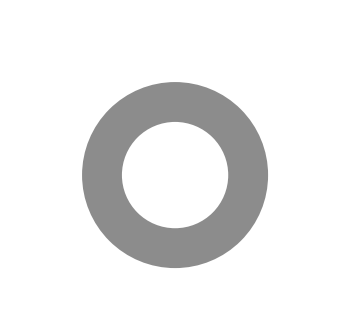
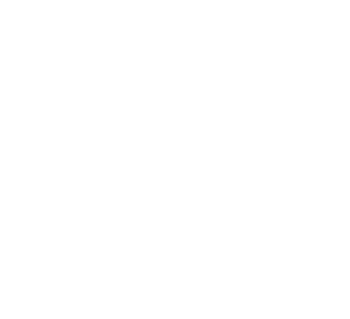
part: (175, 175) -> none

